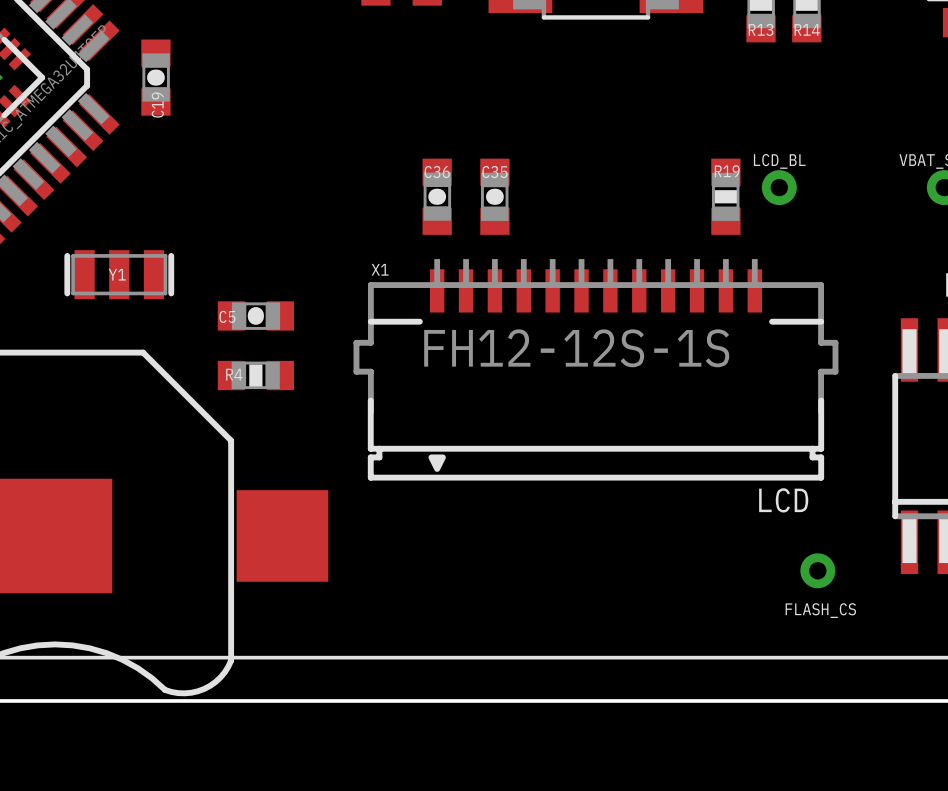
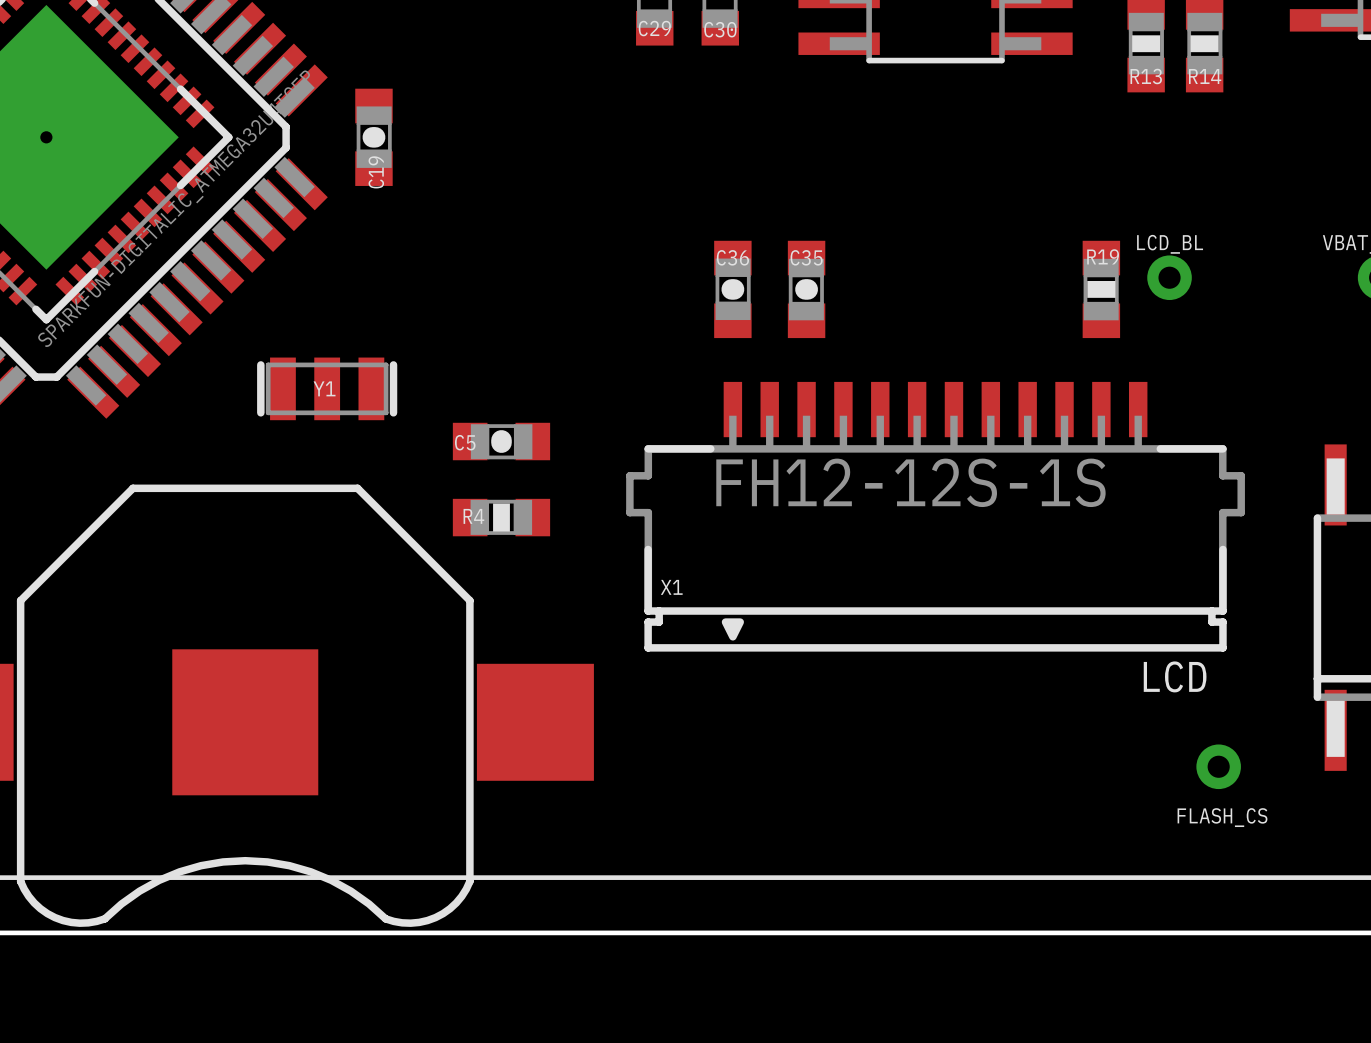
X1 footprint: [353, 259, 839, 481] -> [626, 381, 1245, 652]
X1 name position: X1 (380, 269) -> X1 (671, 587)

